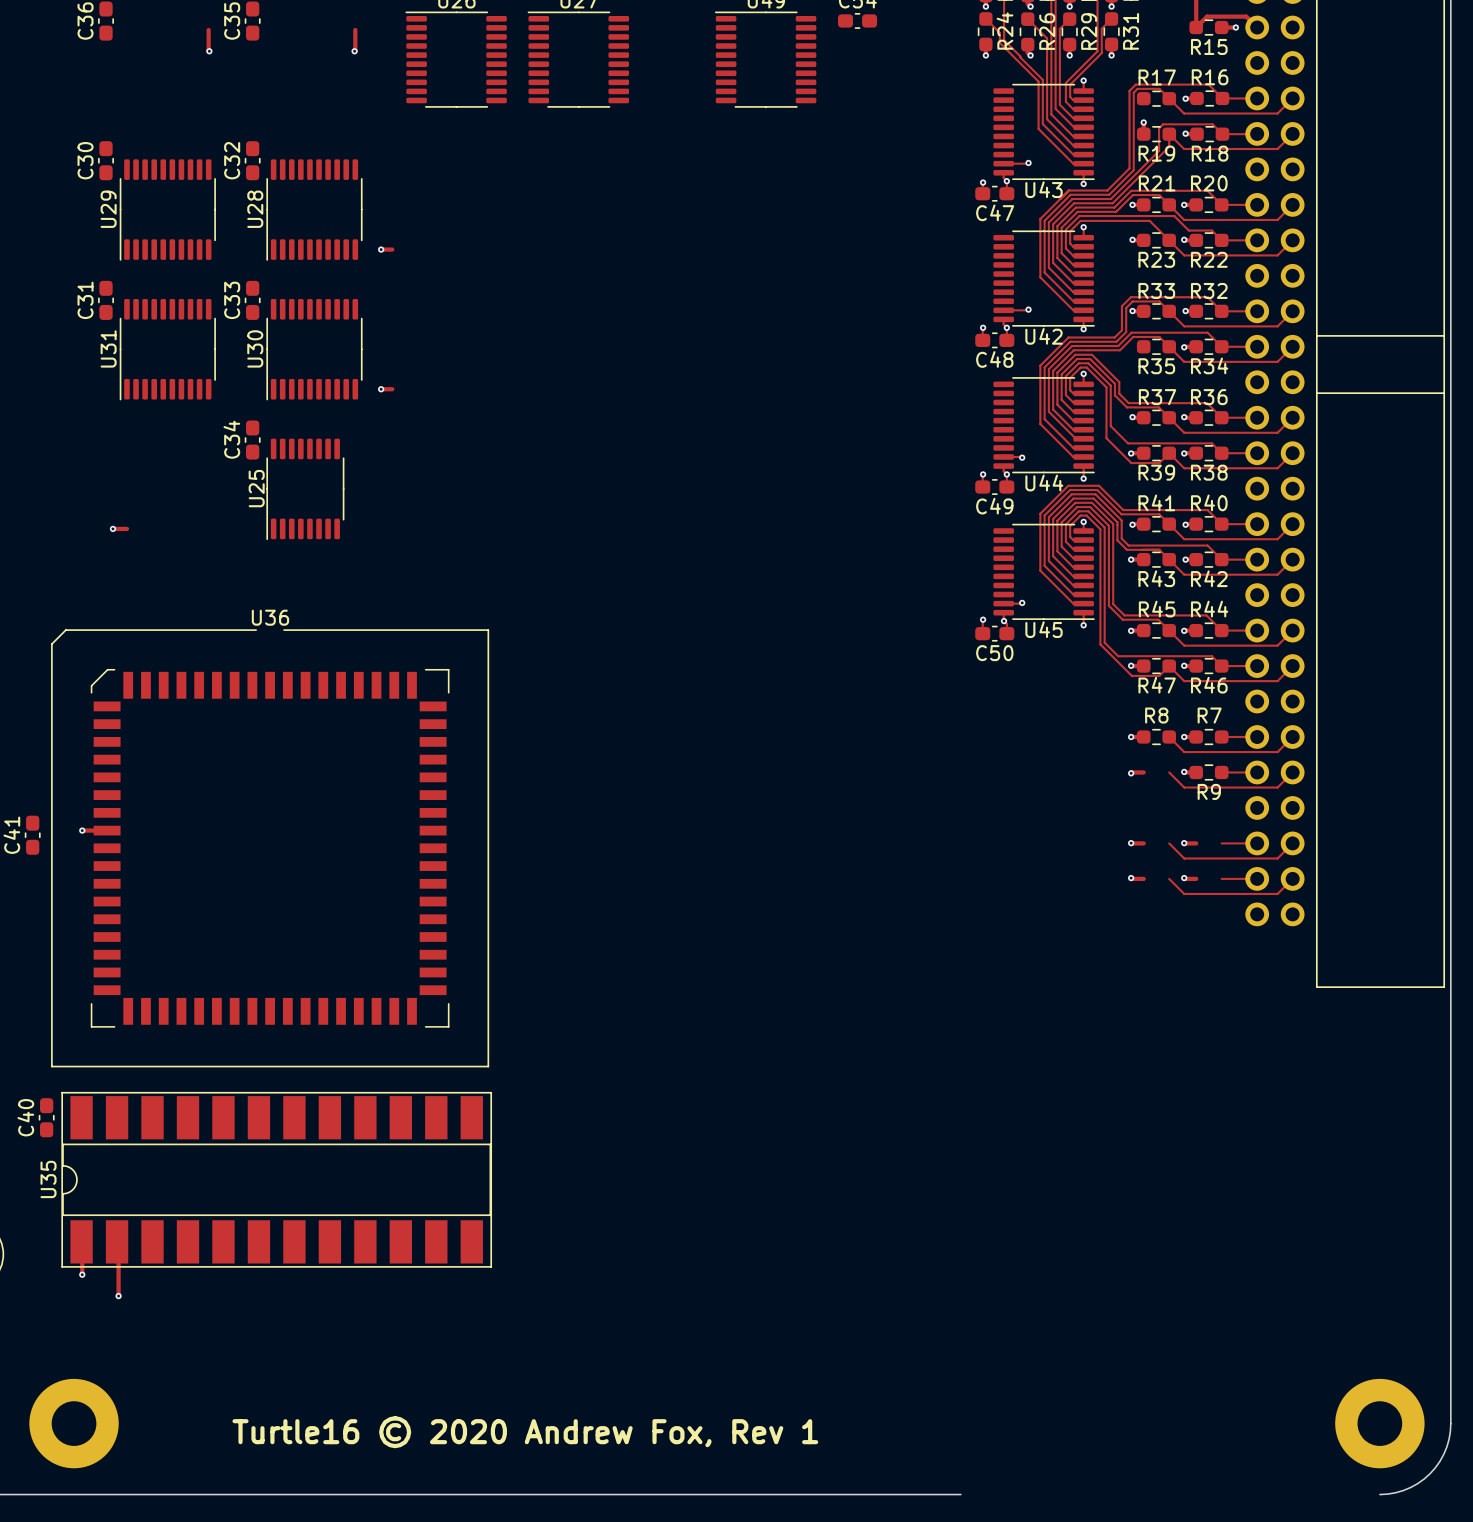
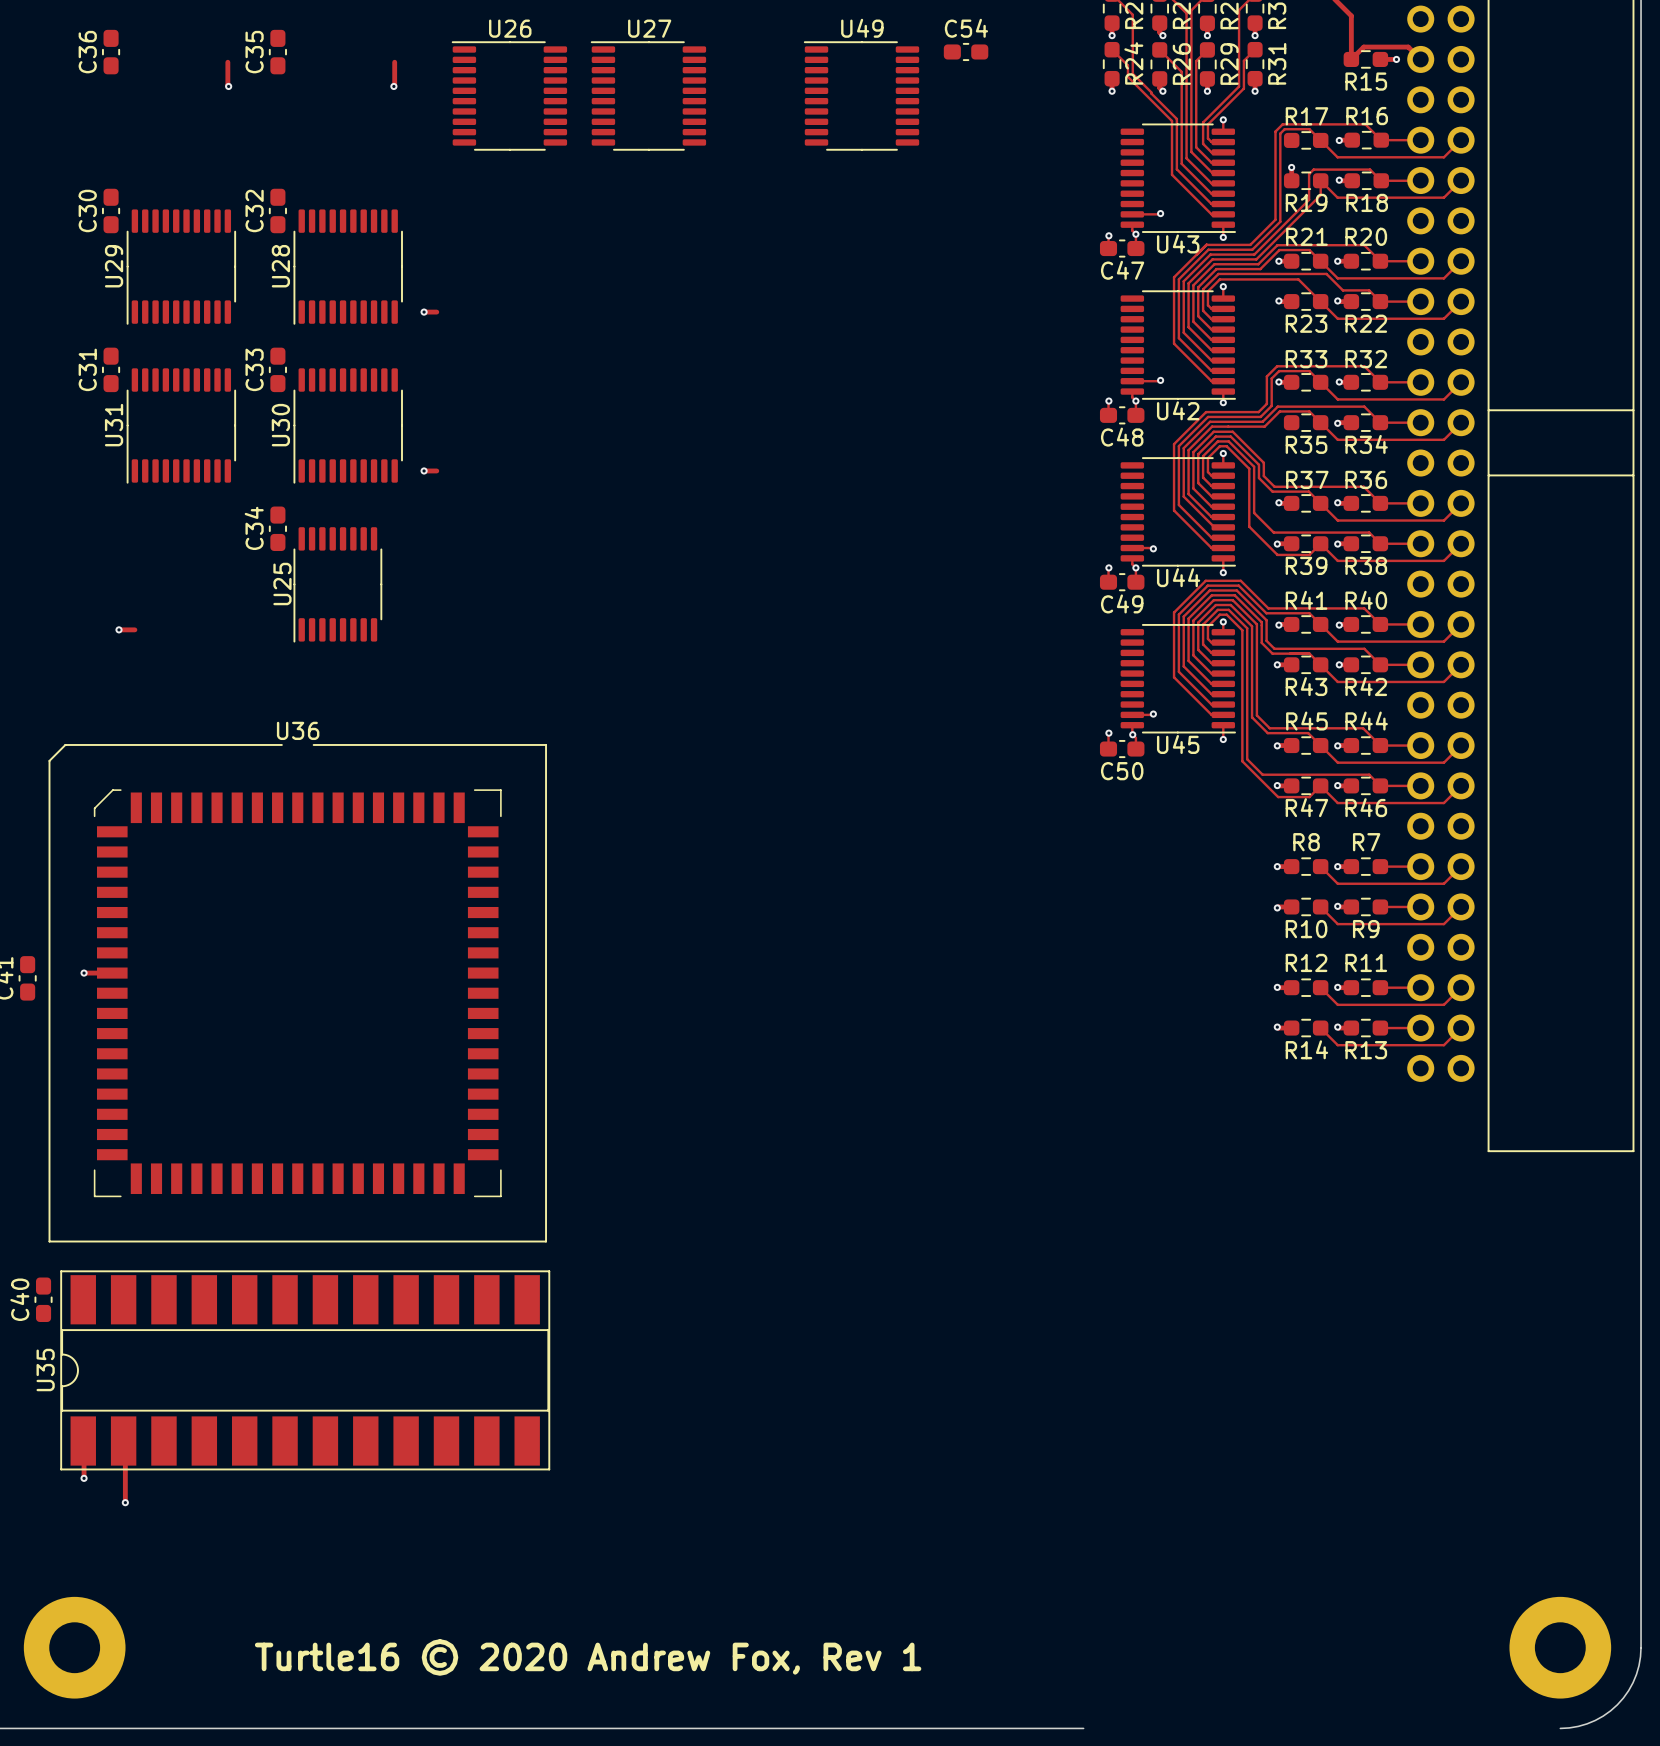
R10: none -> (1306, 906)
R12: none -> (1306, 987)
R11: none -> (1365, 987)
R14: none -> (1306, 1028)
R13: none -> (1365, 1028)

